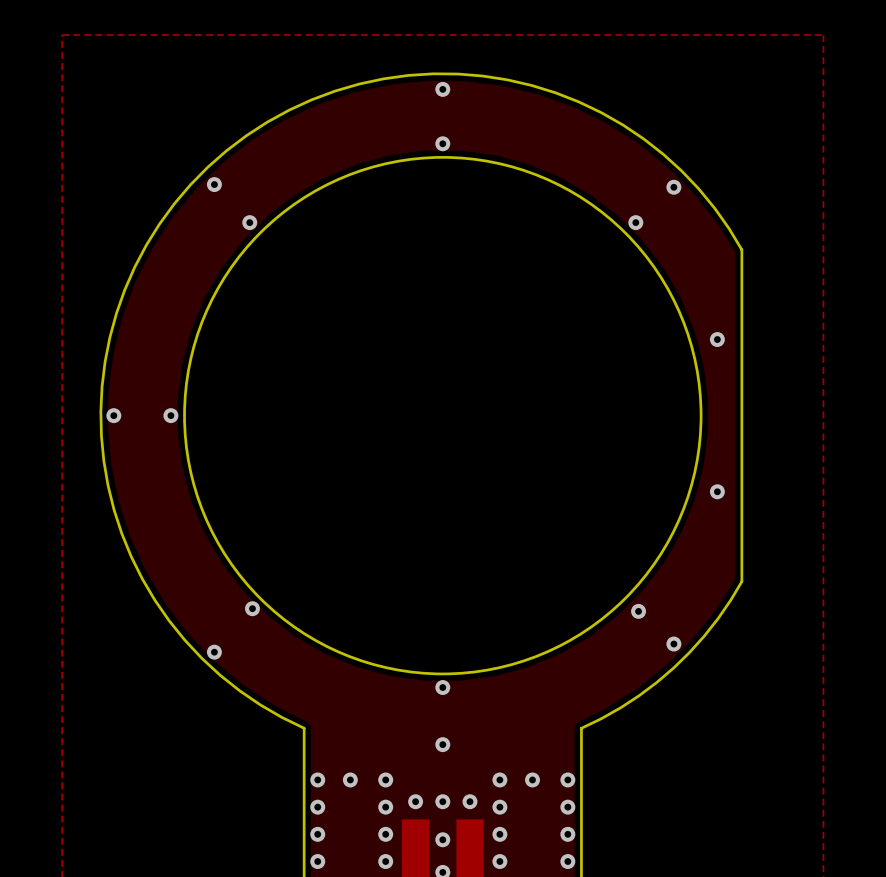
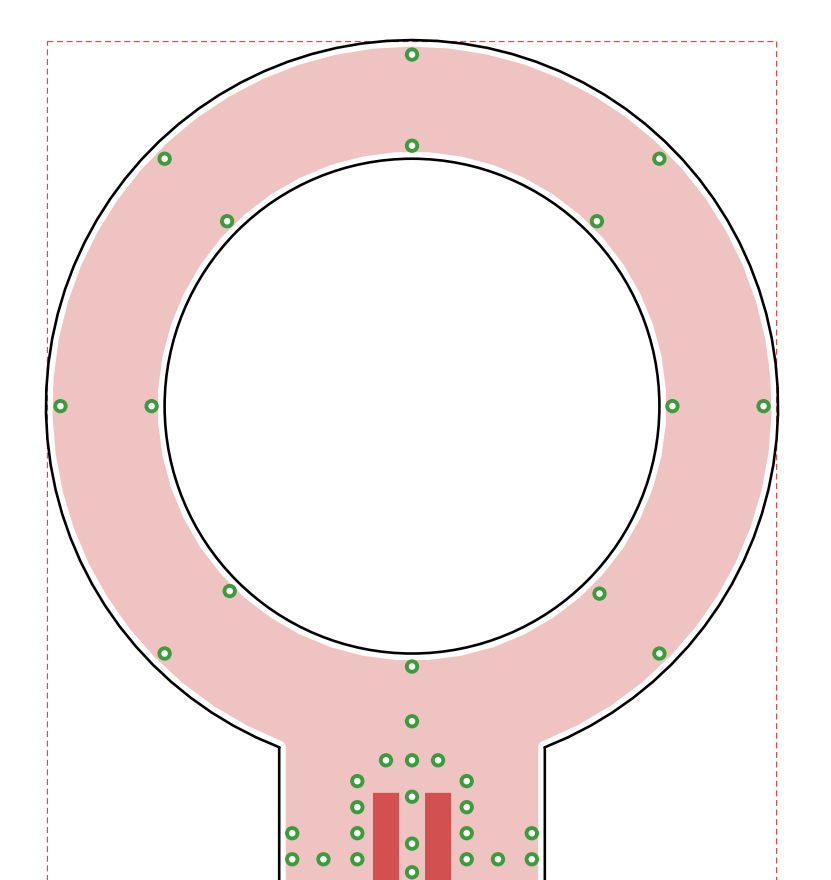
via position: (442, 89) -> (412, 54)
via position: (214, 184) -> (164, 158)
via position: (673, 187) -> (659, 158)
via: (717, 339) -> none
via position: (113, 415) -> (60, 406)
via: none -> (672, 406)
via: none -> (763, 406)
via: (717, 491) -> none
via position: (673, 644) -> (659, 653)
via position: (214, 652) -> (164, 653)
board edge: (304, 771) (304, 728) (260, 704) (239, 690) (201, 658) (169, 620) (154, 600) (131, 556) (114, 509) (103, 461) (100, 411) (105, 361) (116, 313) (134, 267) (159, 223) (174, 203) (207, 167) (246, 135) (267, 122) (311, 99) (359, 84) (408, 75) (433, 73) (482, 76) (531, 85) (578, 101) (601, 112) (643, 138) (681, 170) (714, 208) (741, 249) (741, 581) (718, 618) (673, 668) (620, 707) (581, 728) (581, 771) -> (279, 747) (255, 737) (211, 712) (171, 681) (152, 664) (119, 626) (91, 583) (80, 561) (62, 514) (50, 464) (46, 414) (46, 388) (52, 338) (64, 289) (84, 242) (96, 220) (125, 178) (159, 141) (178, 124) (219, 94) (241, 82) (287, 61) (336, 47) (386, 40) (412, 40) (462, 43) (512, 53) (536, 61) (582, 82) (604, 94) (645, 124) (664, 141) (698, 178) (727, 220) (739, 242) (759, 289) (771, 338) (775, 363) (778, 414) (773, 464) (761, 514) (743, 561) (732, 583) (704, 626) (671, 664) (652, 681) (612, 712) (590, 725) (544, 747)
via: (317, 779) -> none
via: (350, 779) -> none
via: (385, 779) -> none
via: (499, 779) -> none
via: (532, 779) -> none
via: (567, 779) -> none
via: none -> (385, 760)
via: none -> (412, 760)
via: none -> (438, 760)
via: (415, 801) -> none
via: (442, 801) -> none
via: (469, 801) -> none
via: (317, 807) -> none
via: (567, 807) -> none
via: none -> (412, 796)
via: (317, 834) -> none
via: (567, 834) -> none
via: (442, 839) -> none

